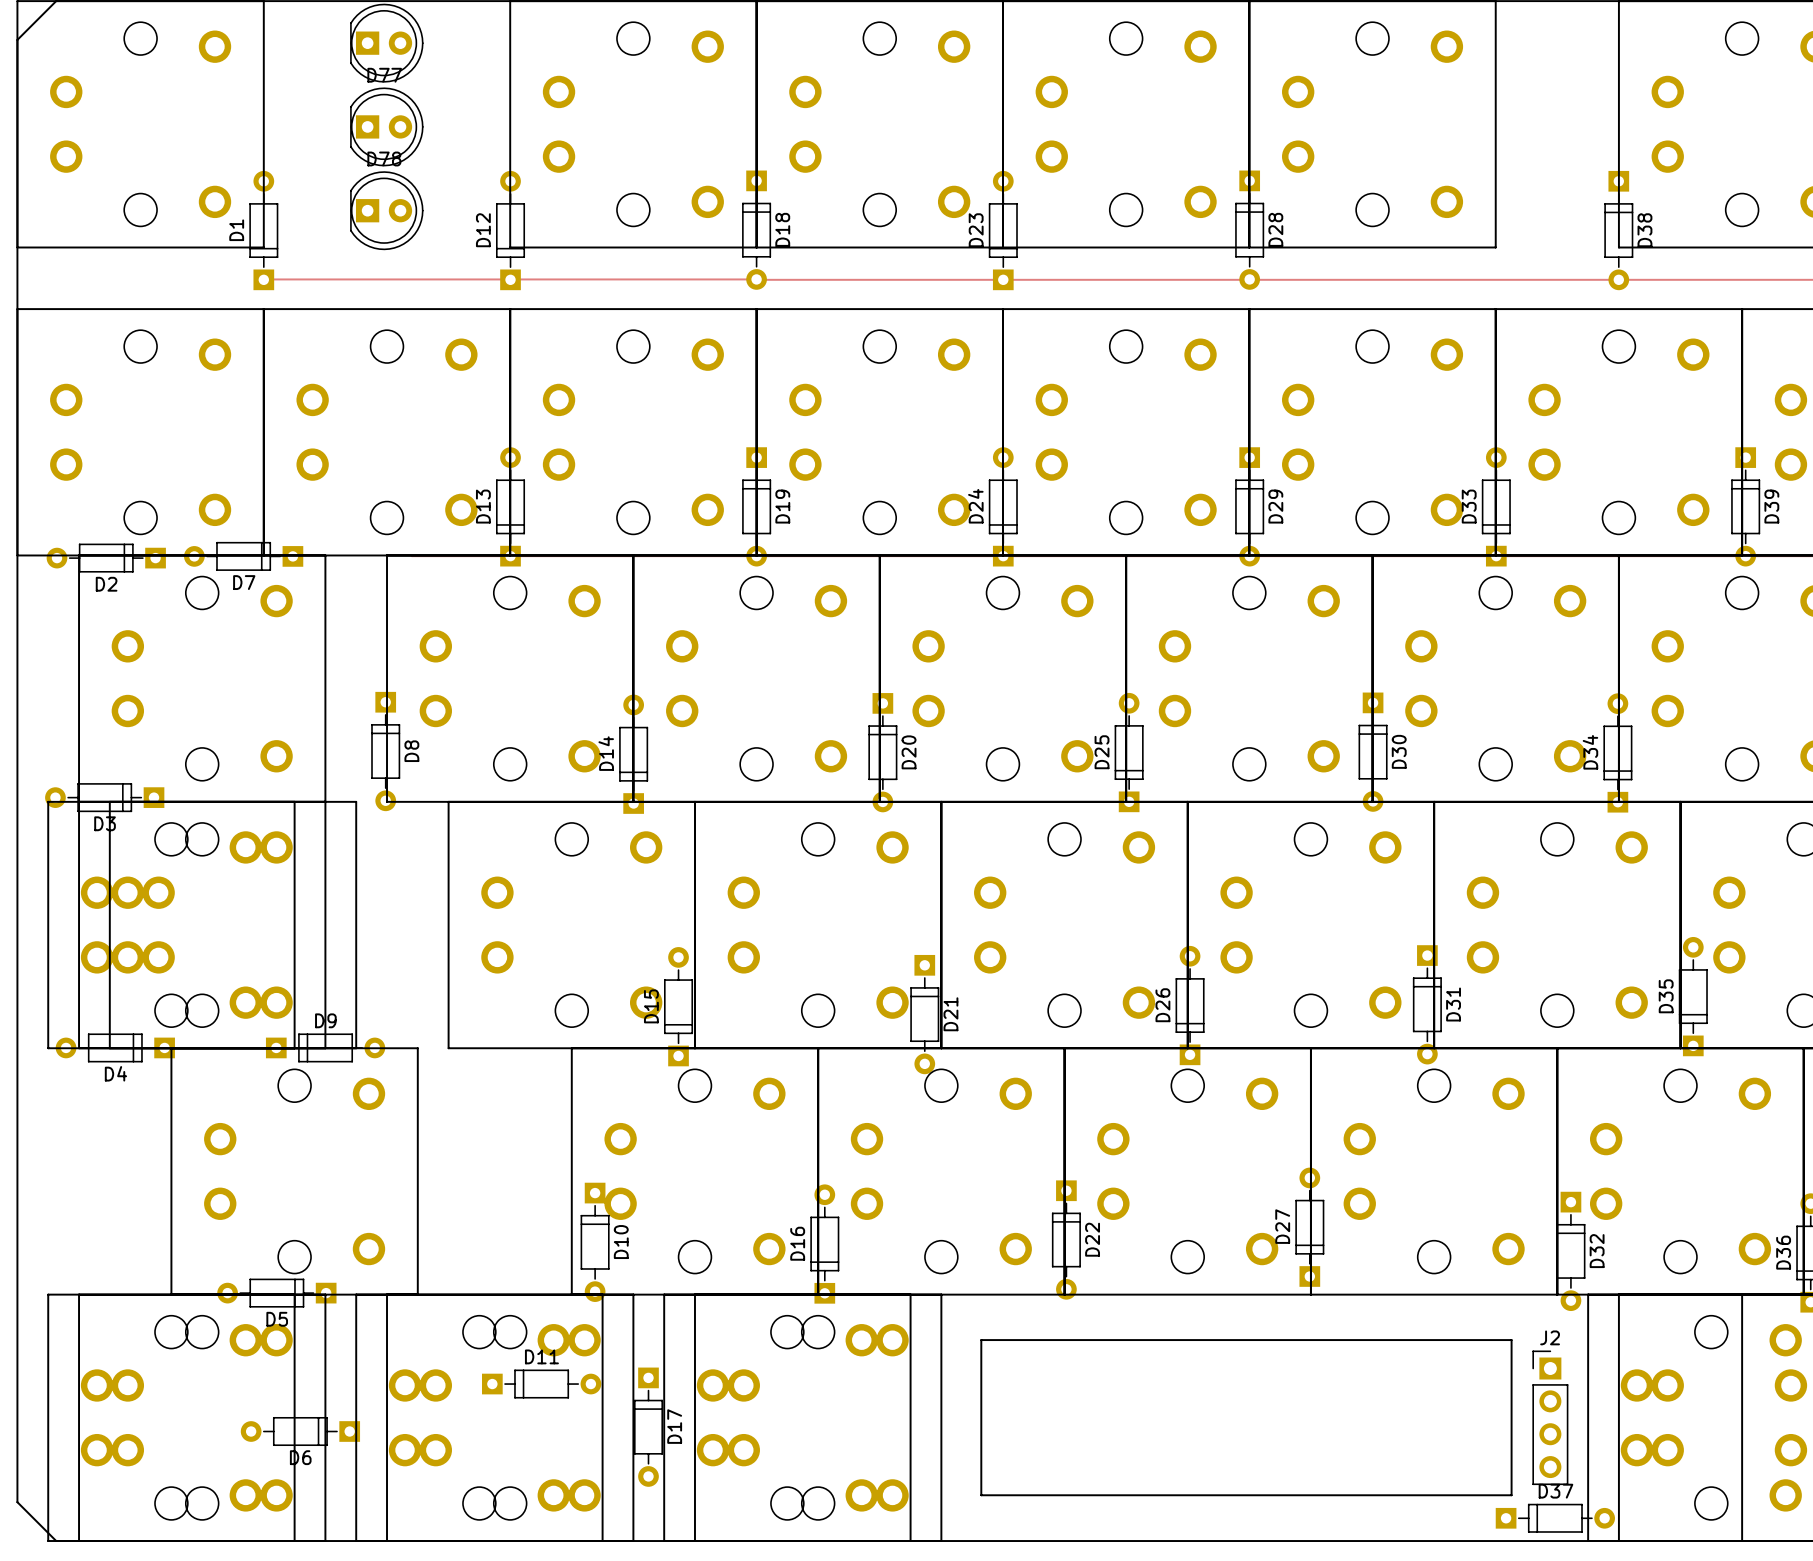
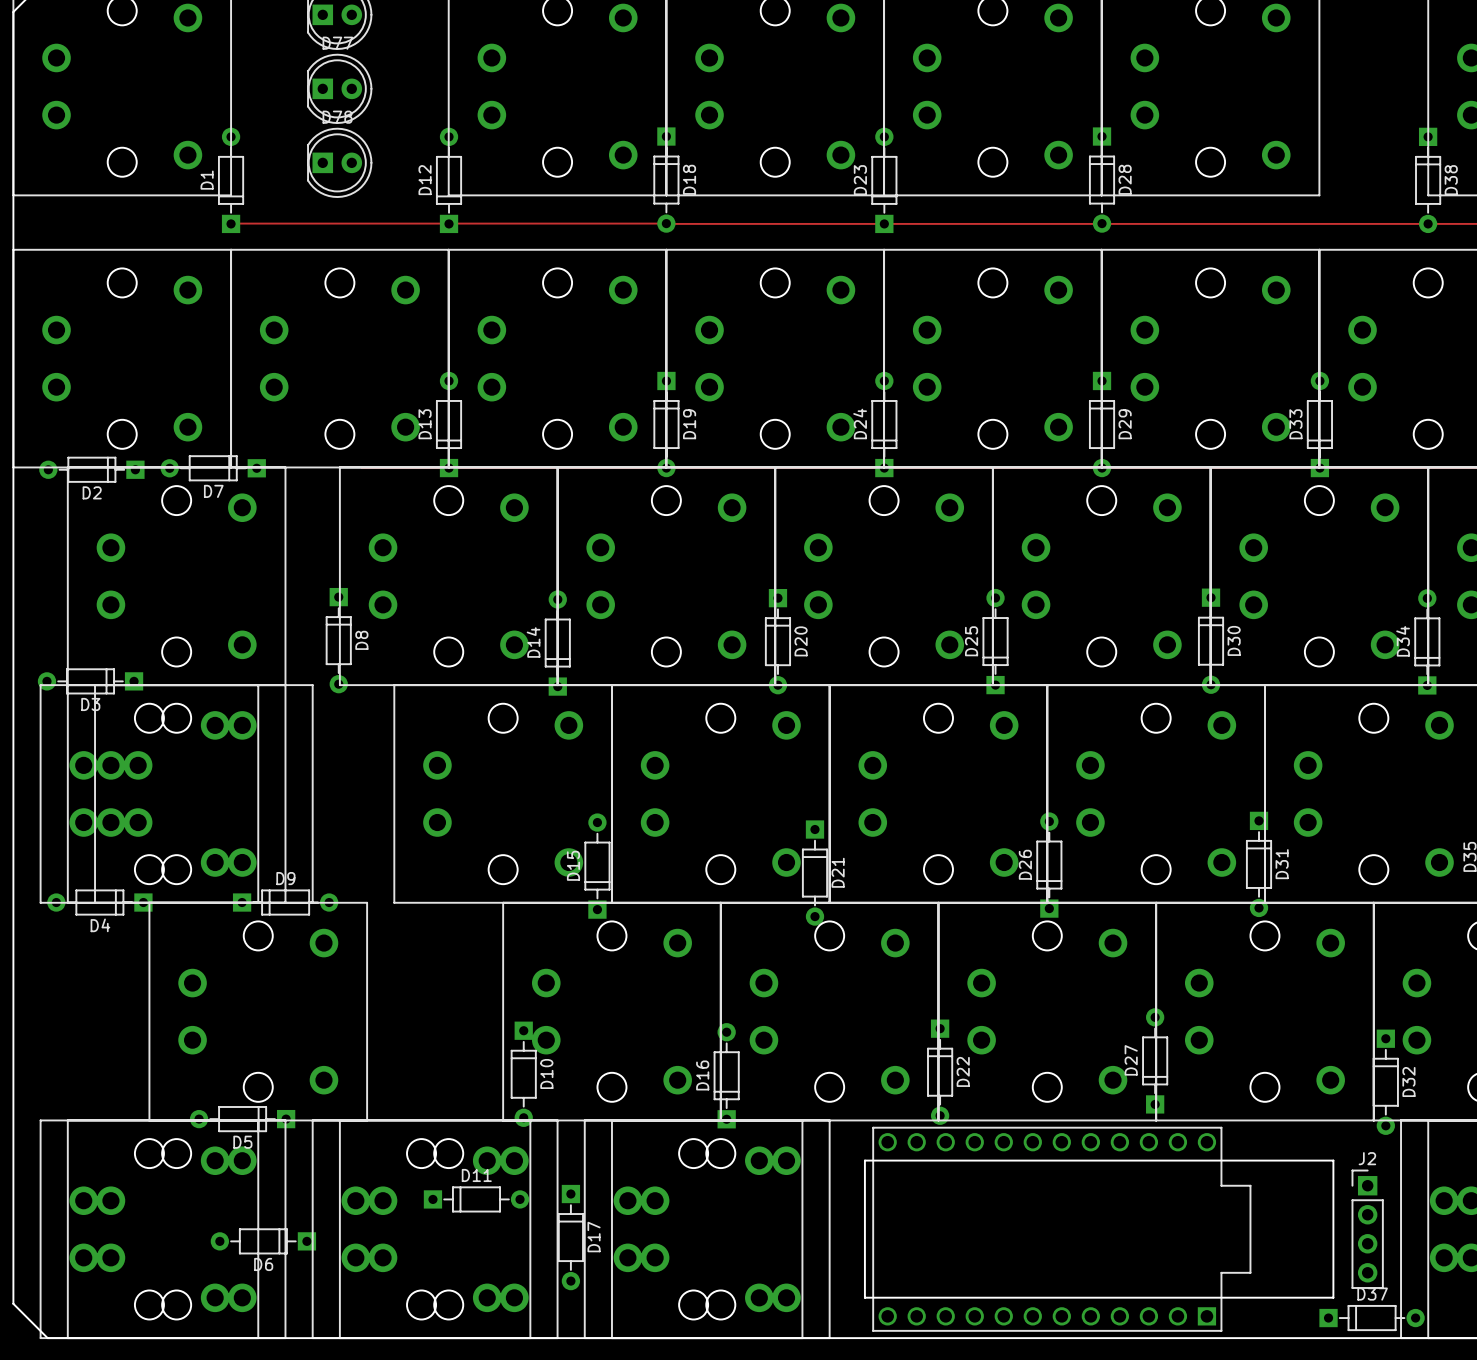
part: none -> (1061, 1229)

